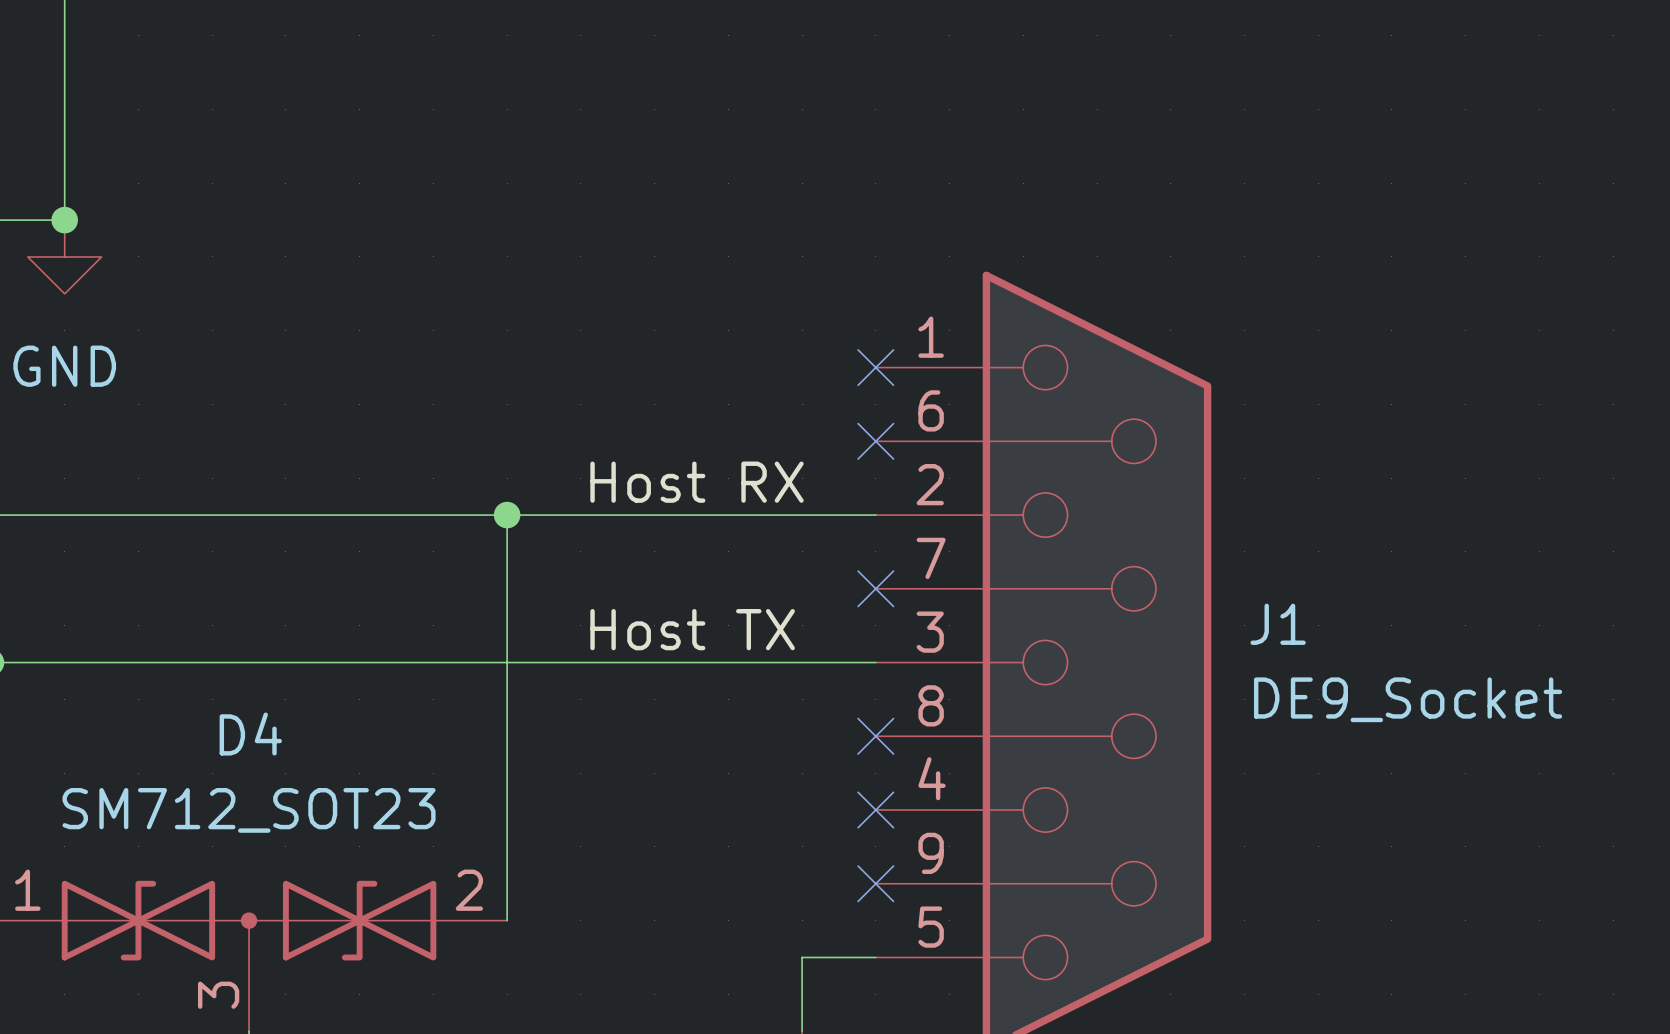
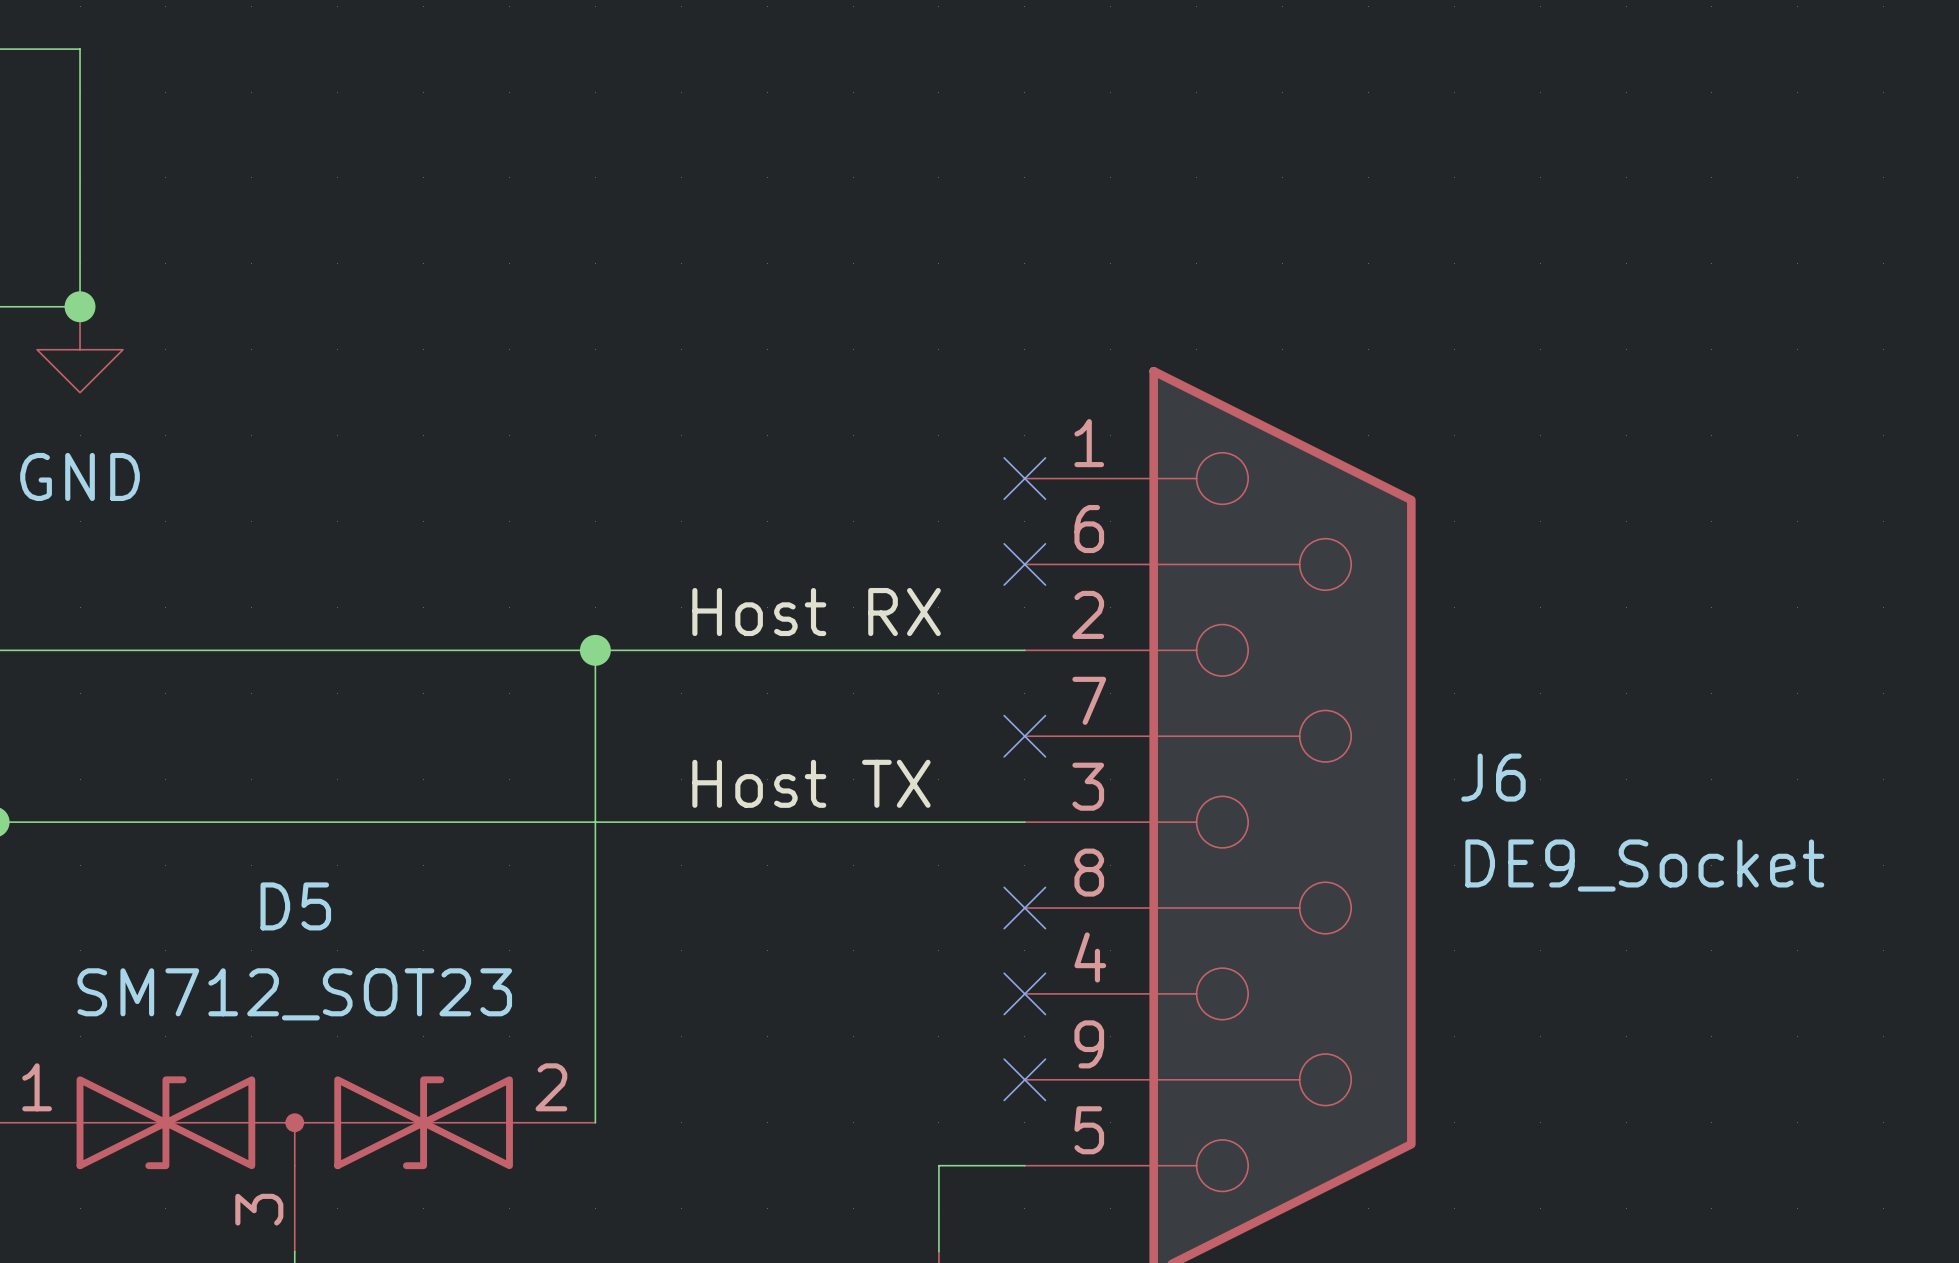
J1 name: J1 (1278, 624) -> J6 (1493, 777)
D4 name: D4 (250, 734) -> D5 (295, 906)

